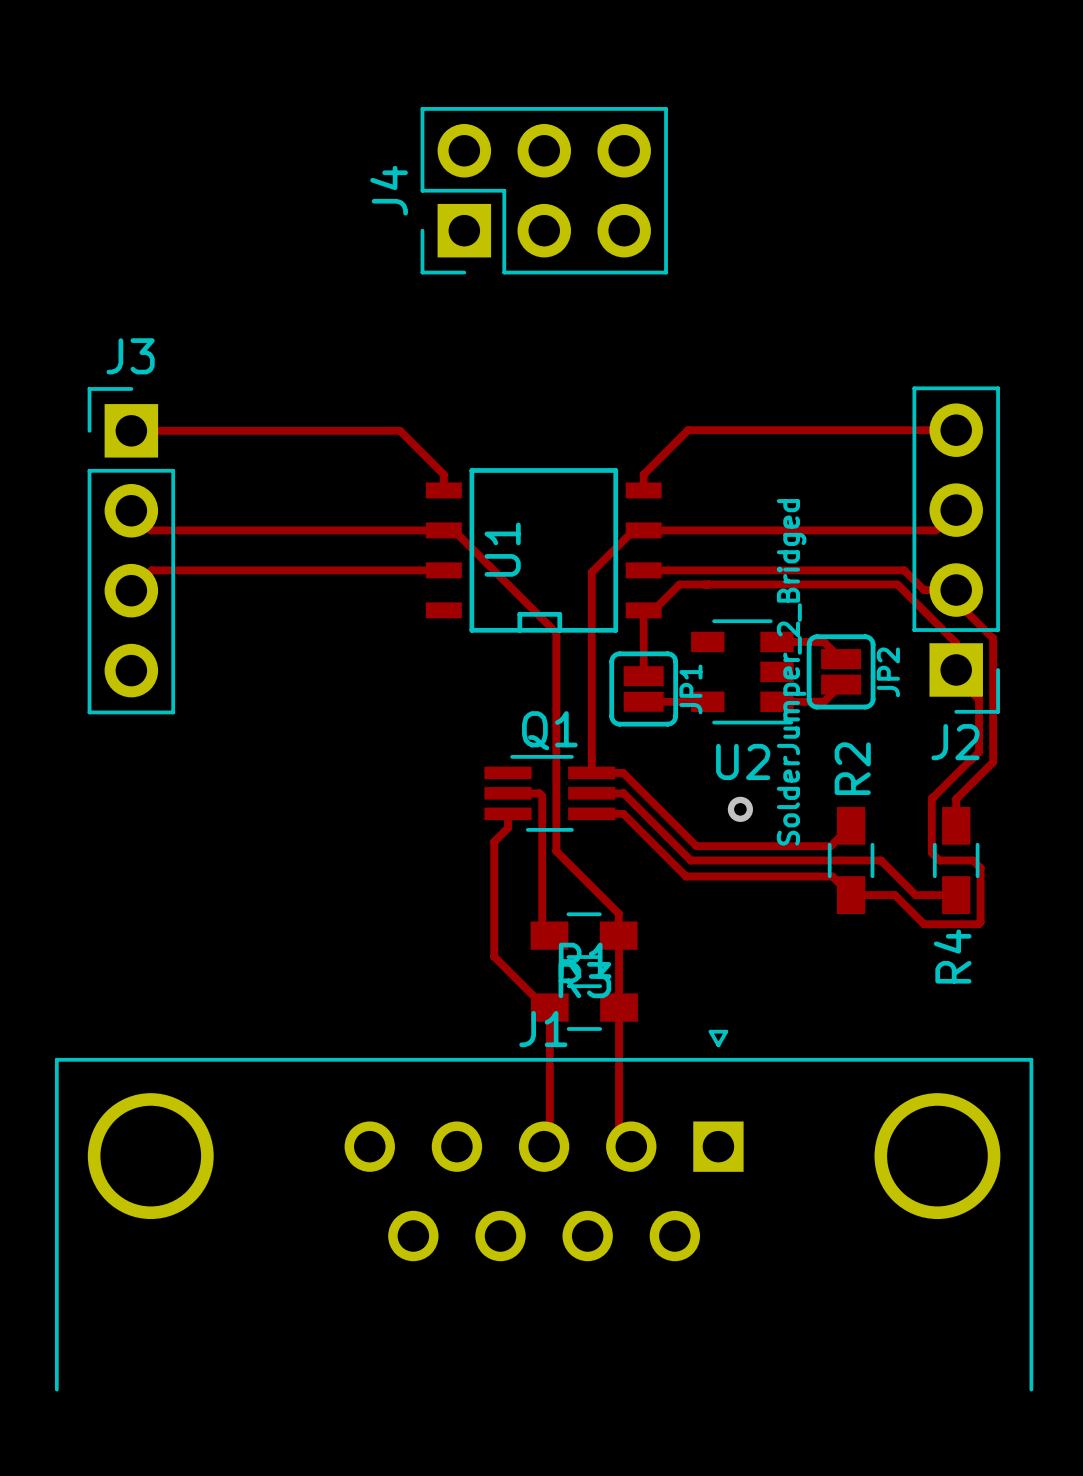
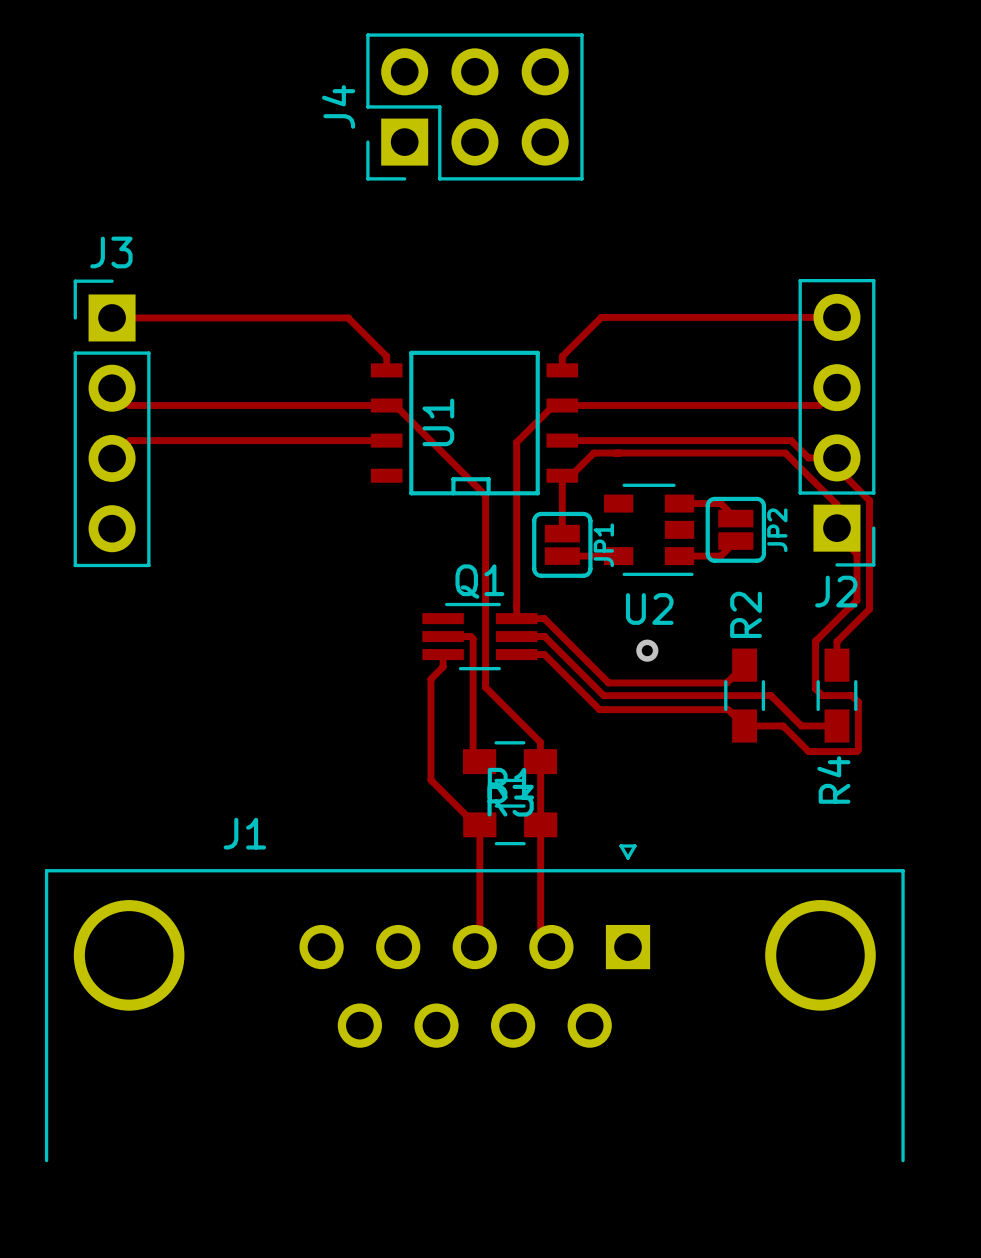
JP2 value: SolderJumper_2_Bridged (791, 672) -> none
J1 name position: J1 (543, 1029) -> J1 (244, 833)

